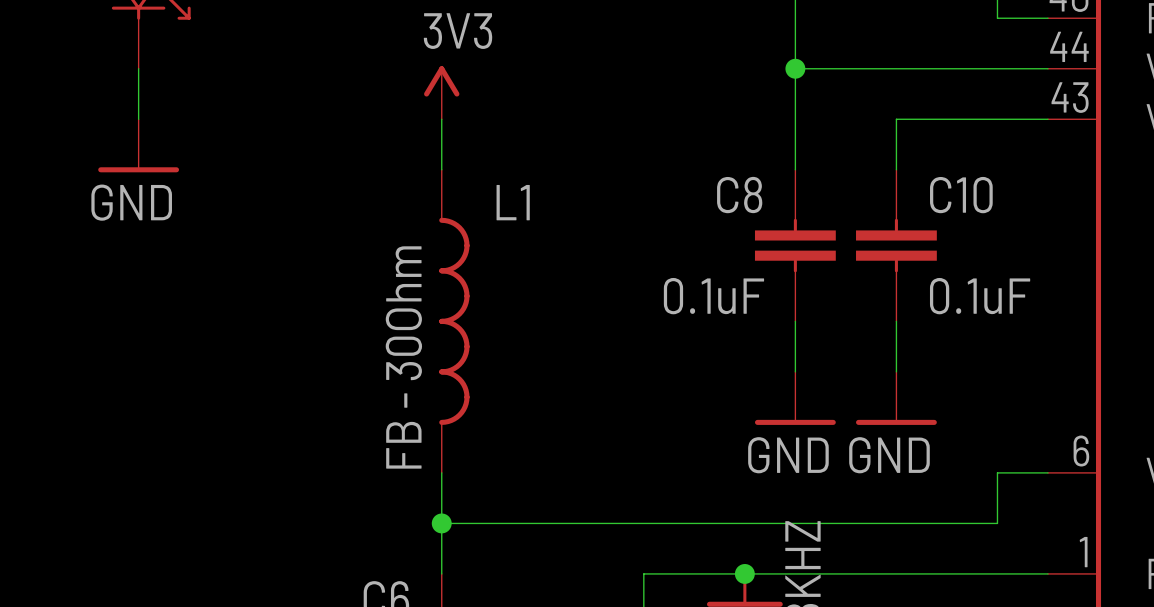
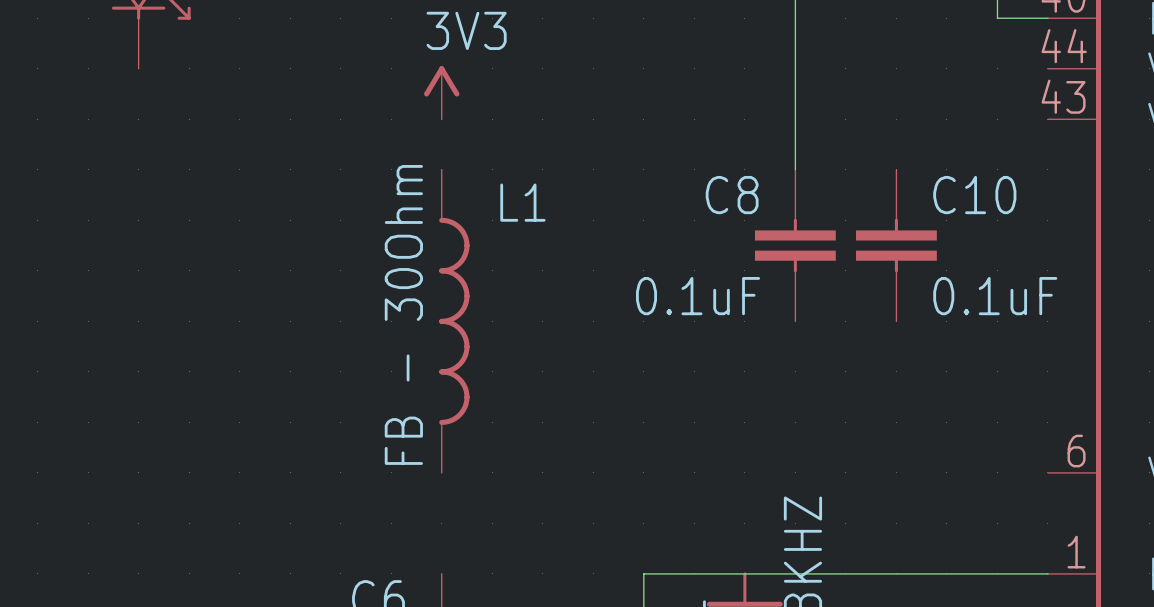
wire: (138, 68) (138, 119) -> none
wire: (795, 68) (1047, 68) -> none
junction: (795, 68) -> none
wire: (441, 119) (441, 169) -> none
wire: (1047, 119) (896, 119) (896, 169) -> none
power symbol: GND (138, 145) -> none
wire: (795, 321) (795, 371) -> none
wire: (896, 321) (896, 371) -> none
power symbol: GND (795, 398) -> none
power symbol: GND (896, 398) -> none
wire: (441, 472) (441, 573) -> none
wire: (1047, 472) (997, 472) (997, 523) (441, 523) -> none
junction: (441, 523) -> none
junction: (744, 573) -> none

